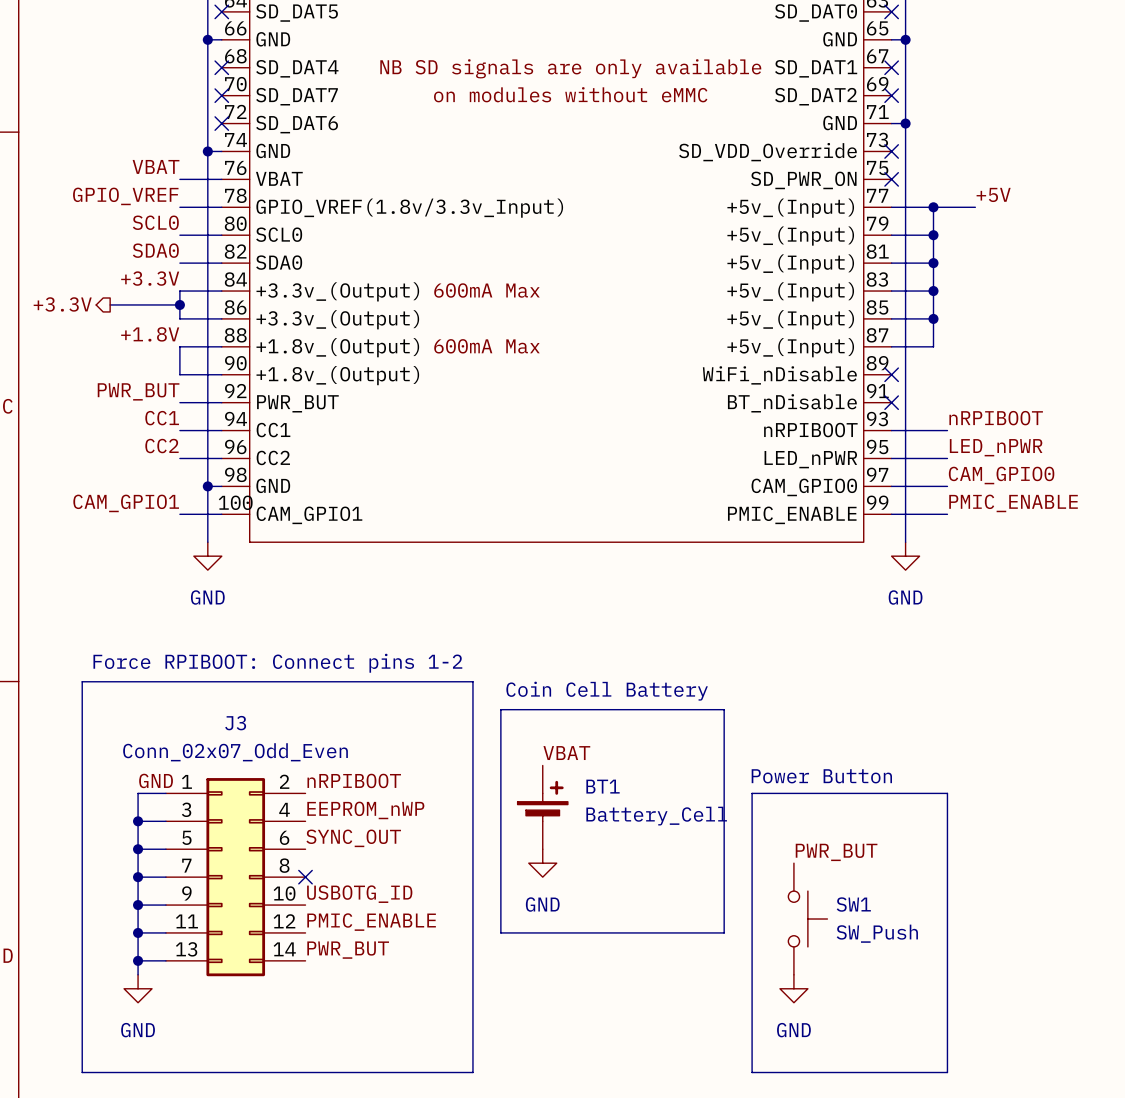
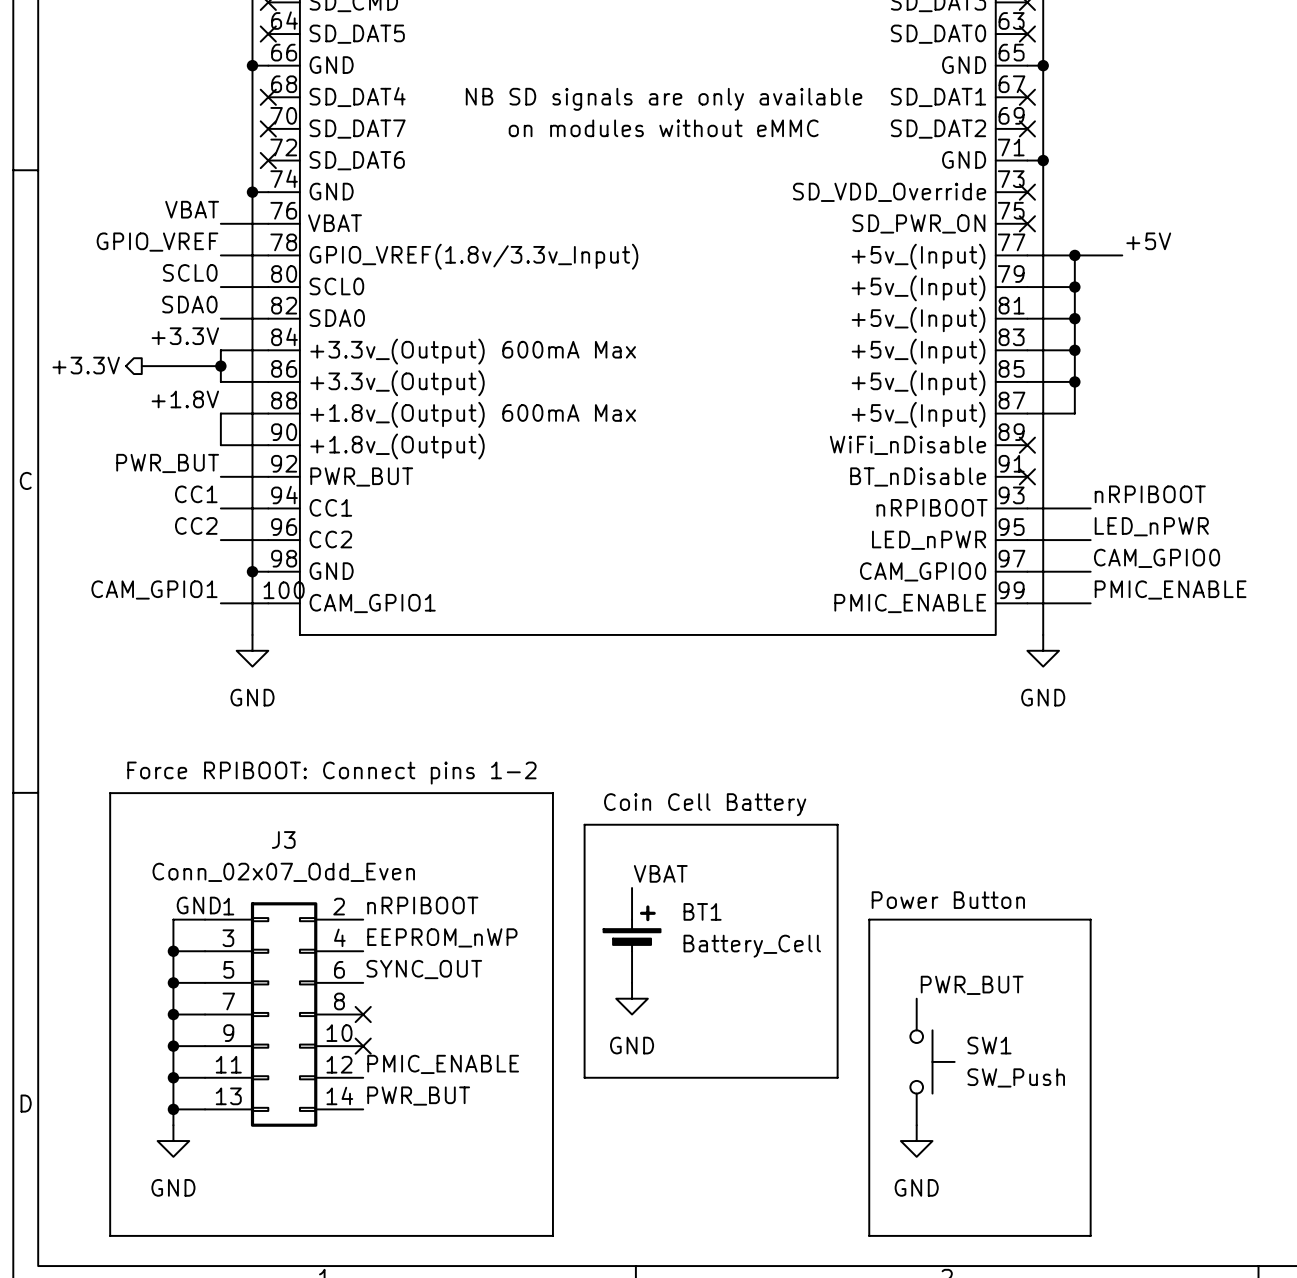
label: USBOTG_ID (359, 894) -> none
no-connect mark: none -> (363, 1046)

